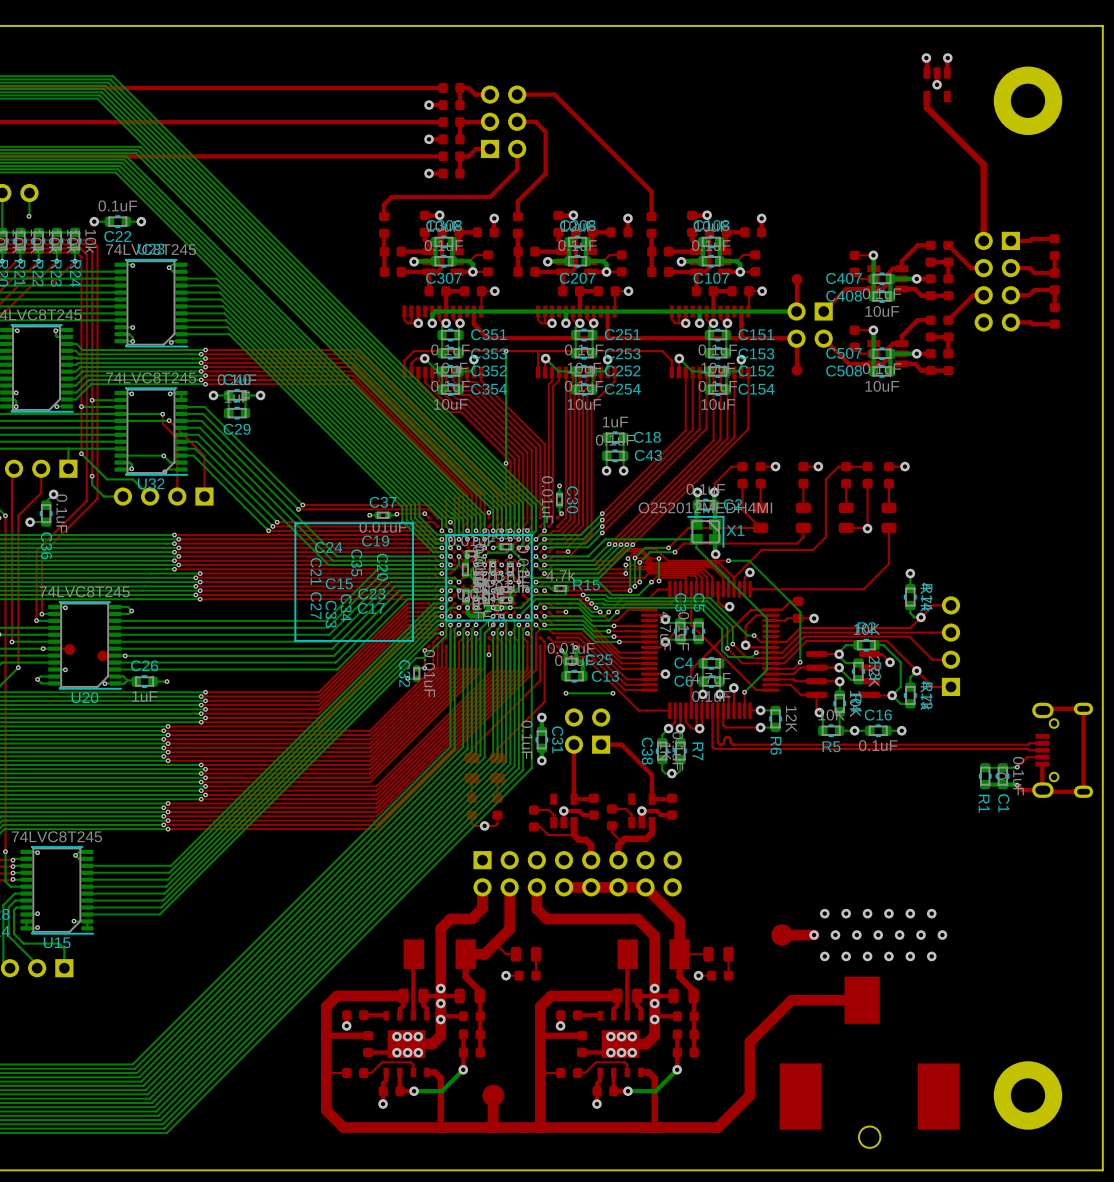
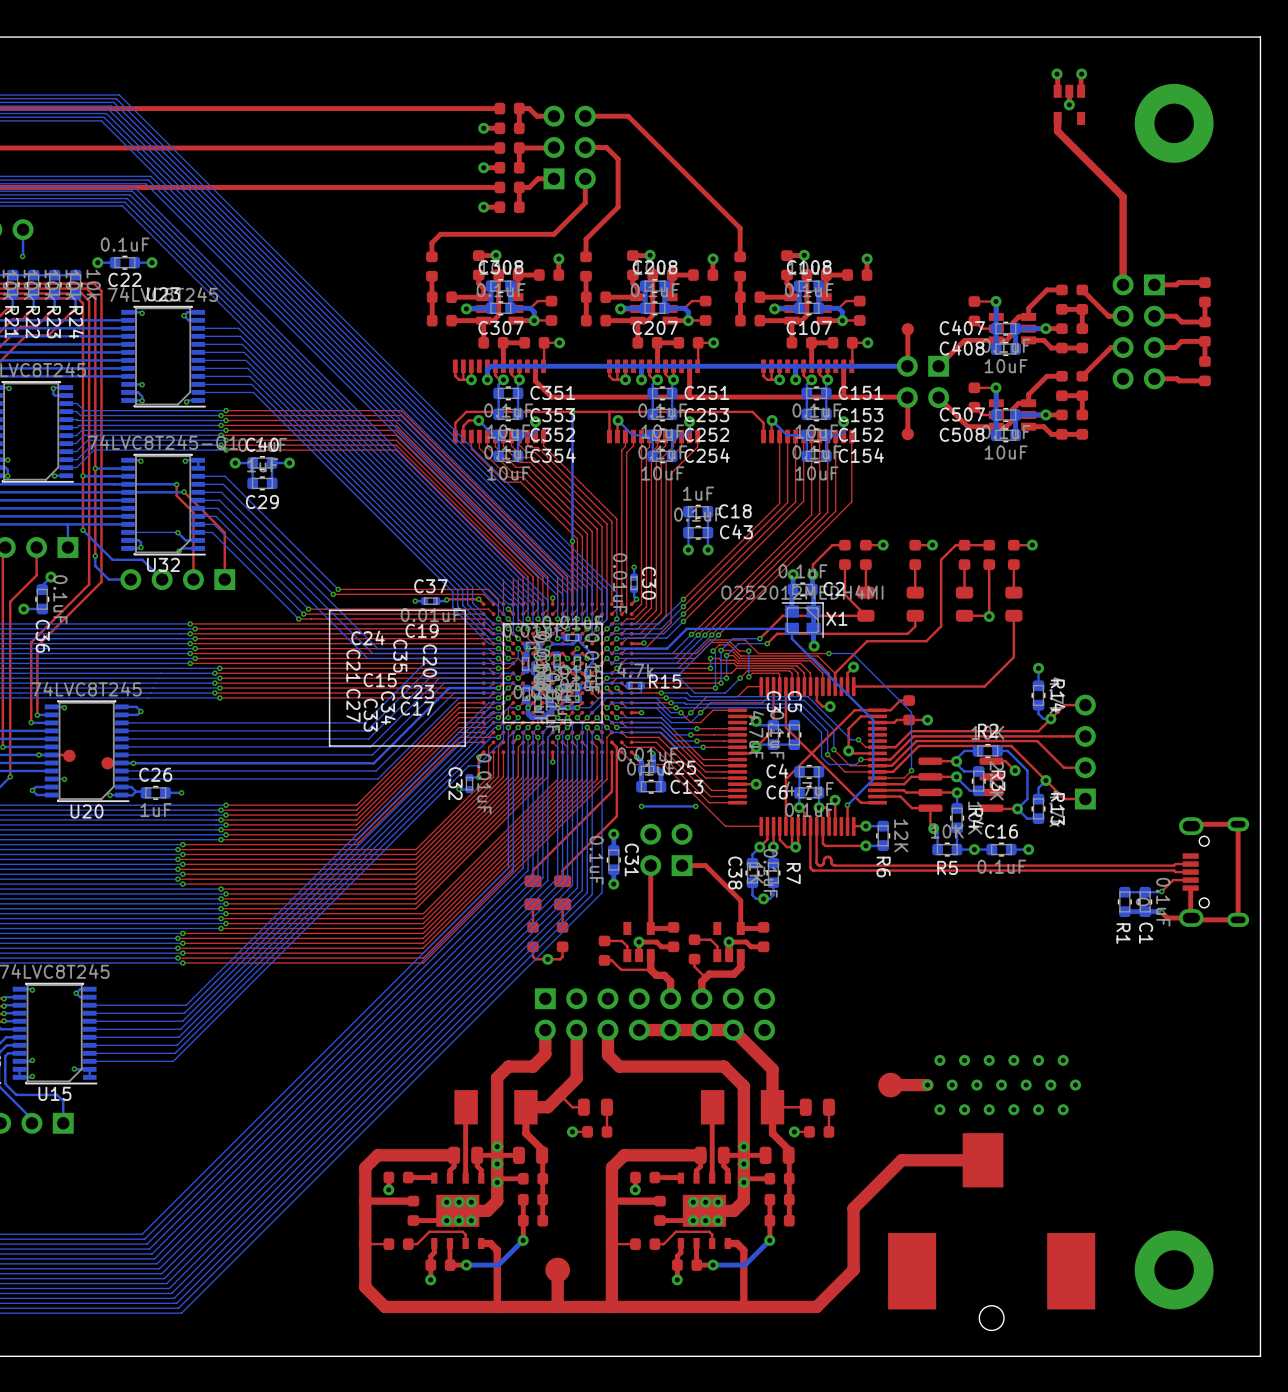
U32 value: 74LVC8T245 (151, 377) -> 74LVC8T245-Q1 (162, 443)

